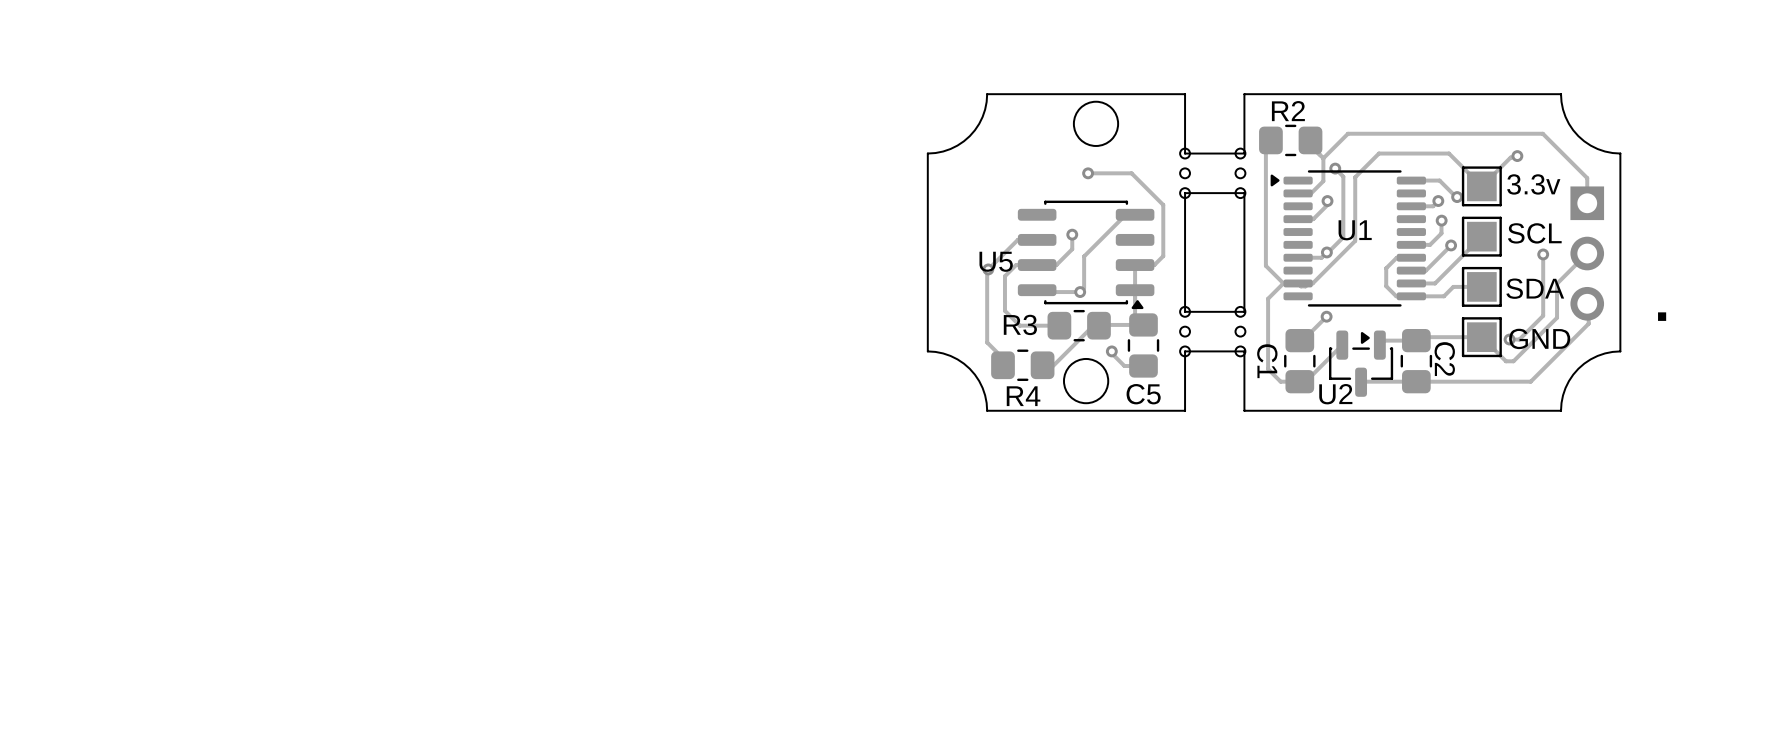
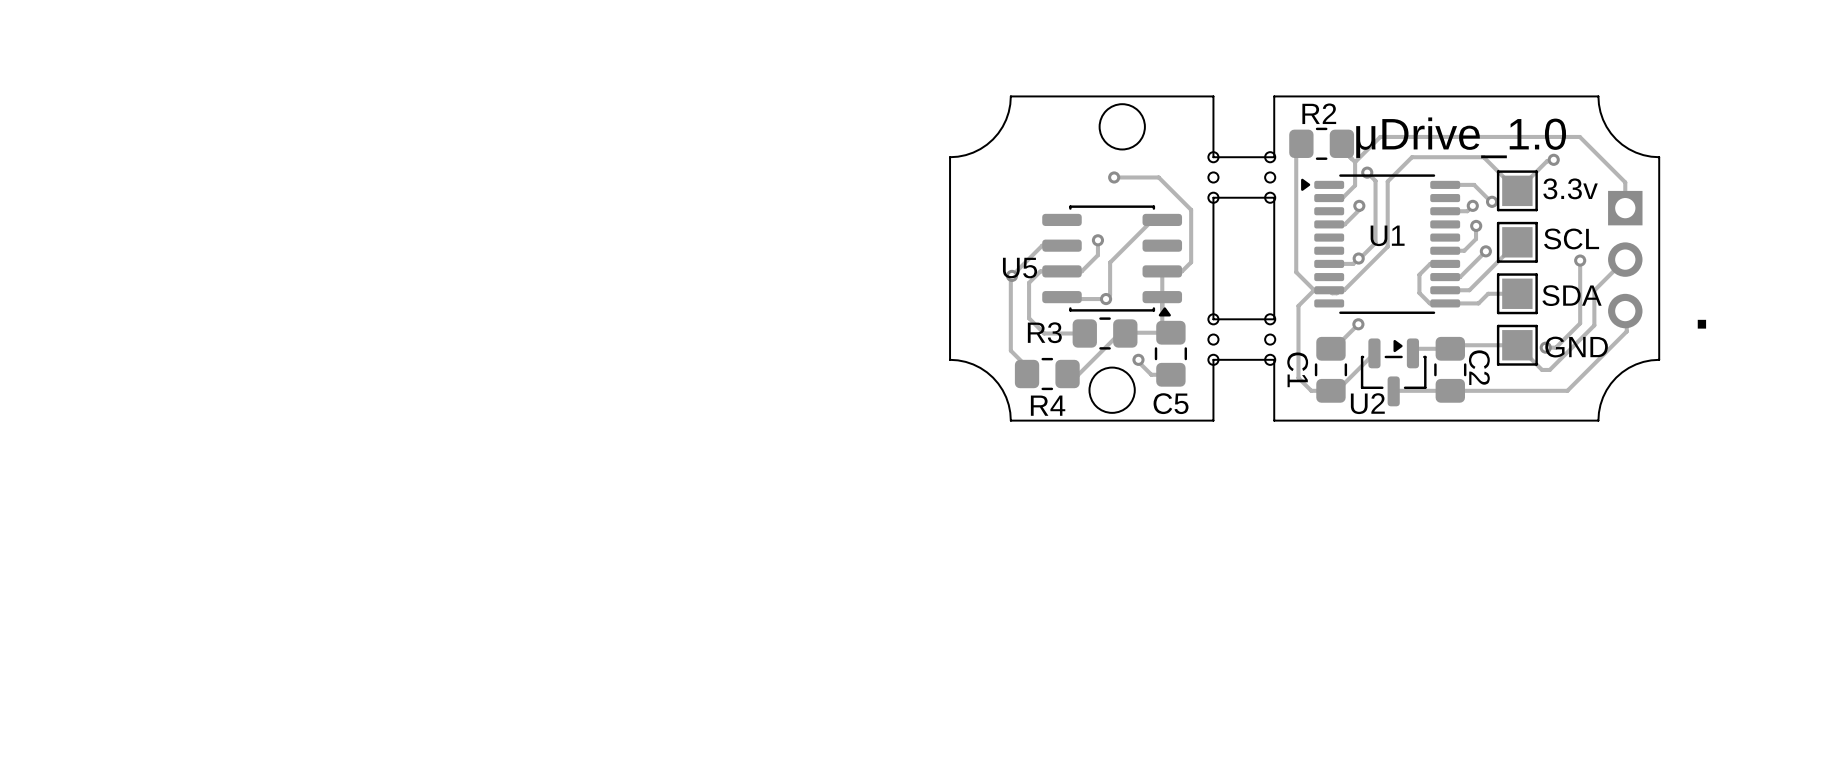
text: none -> μDrive_1.0 (1461, 137)

